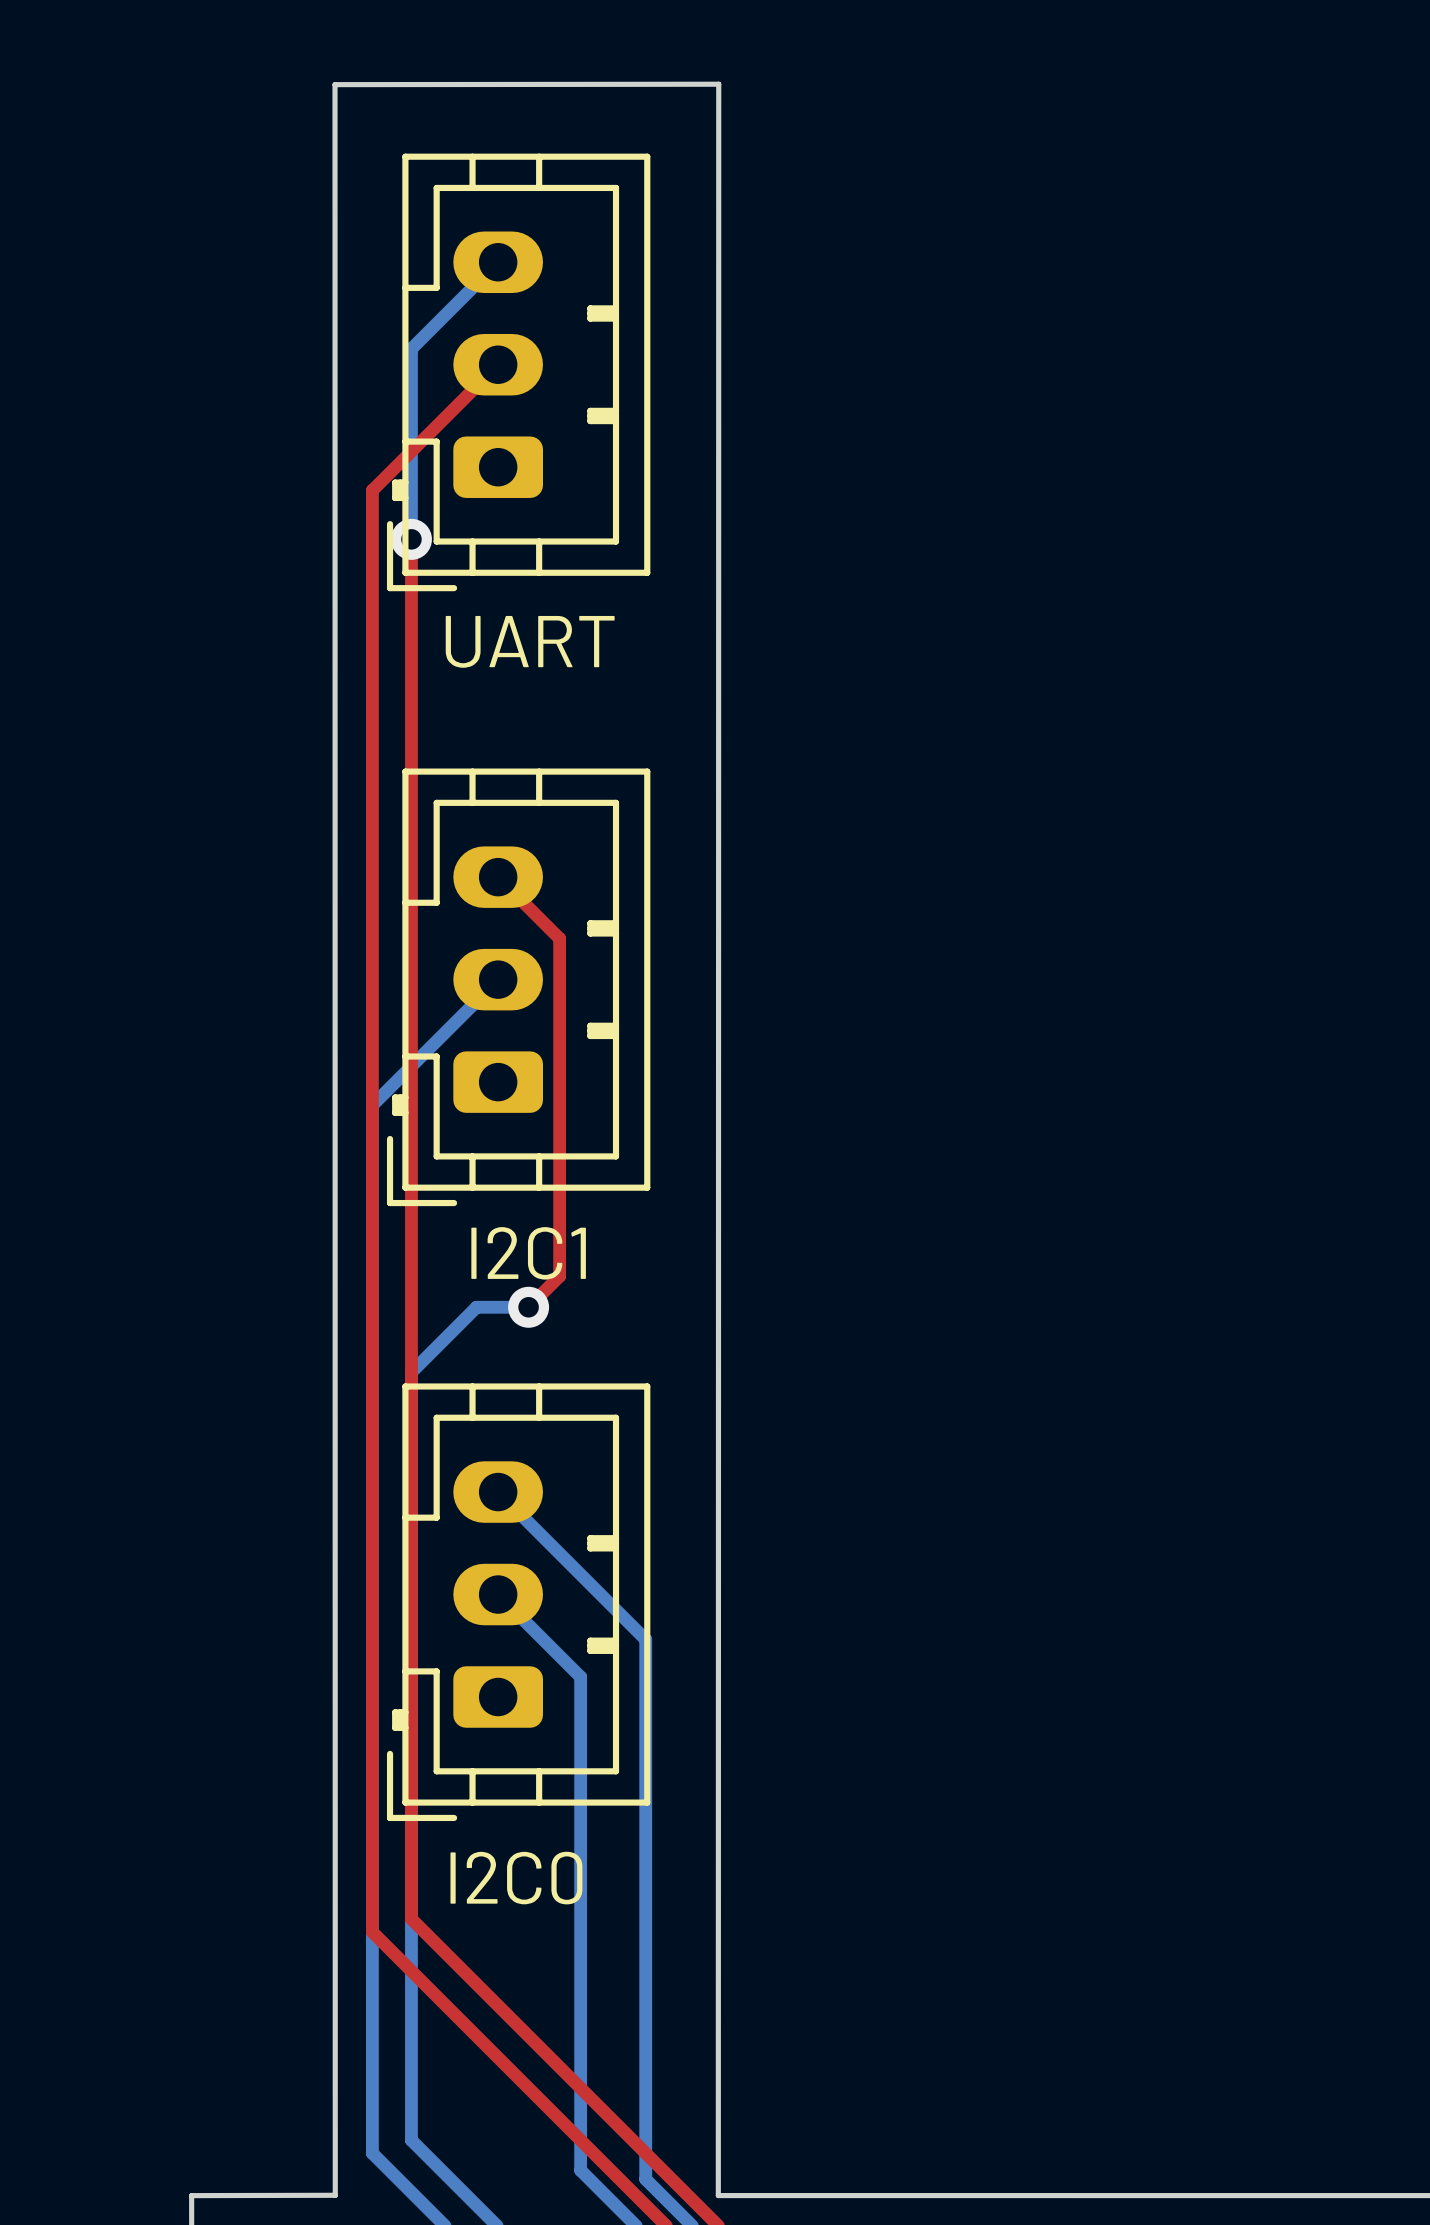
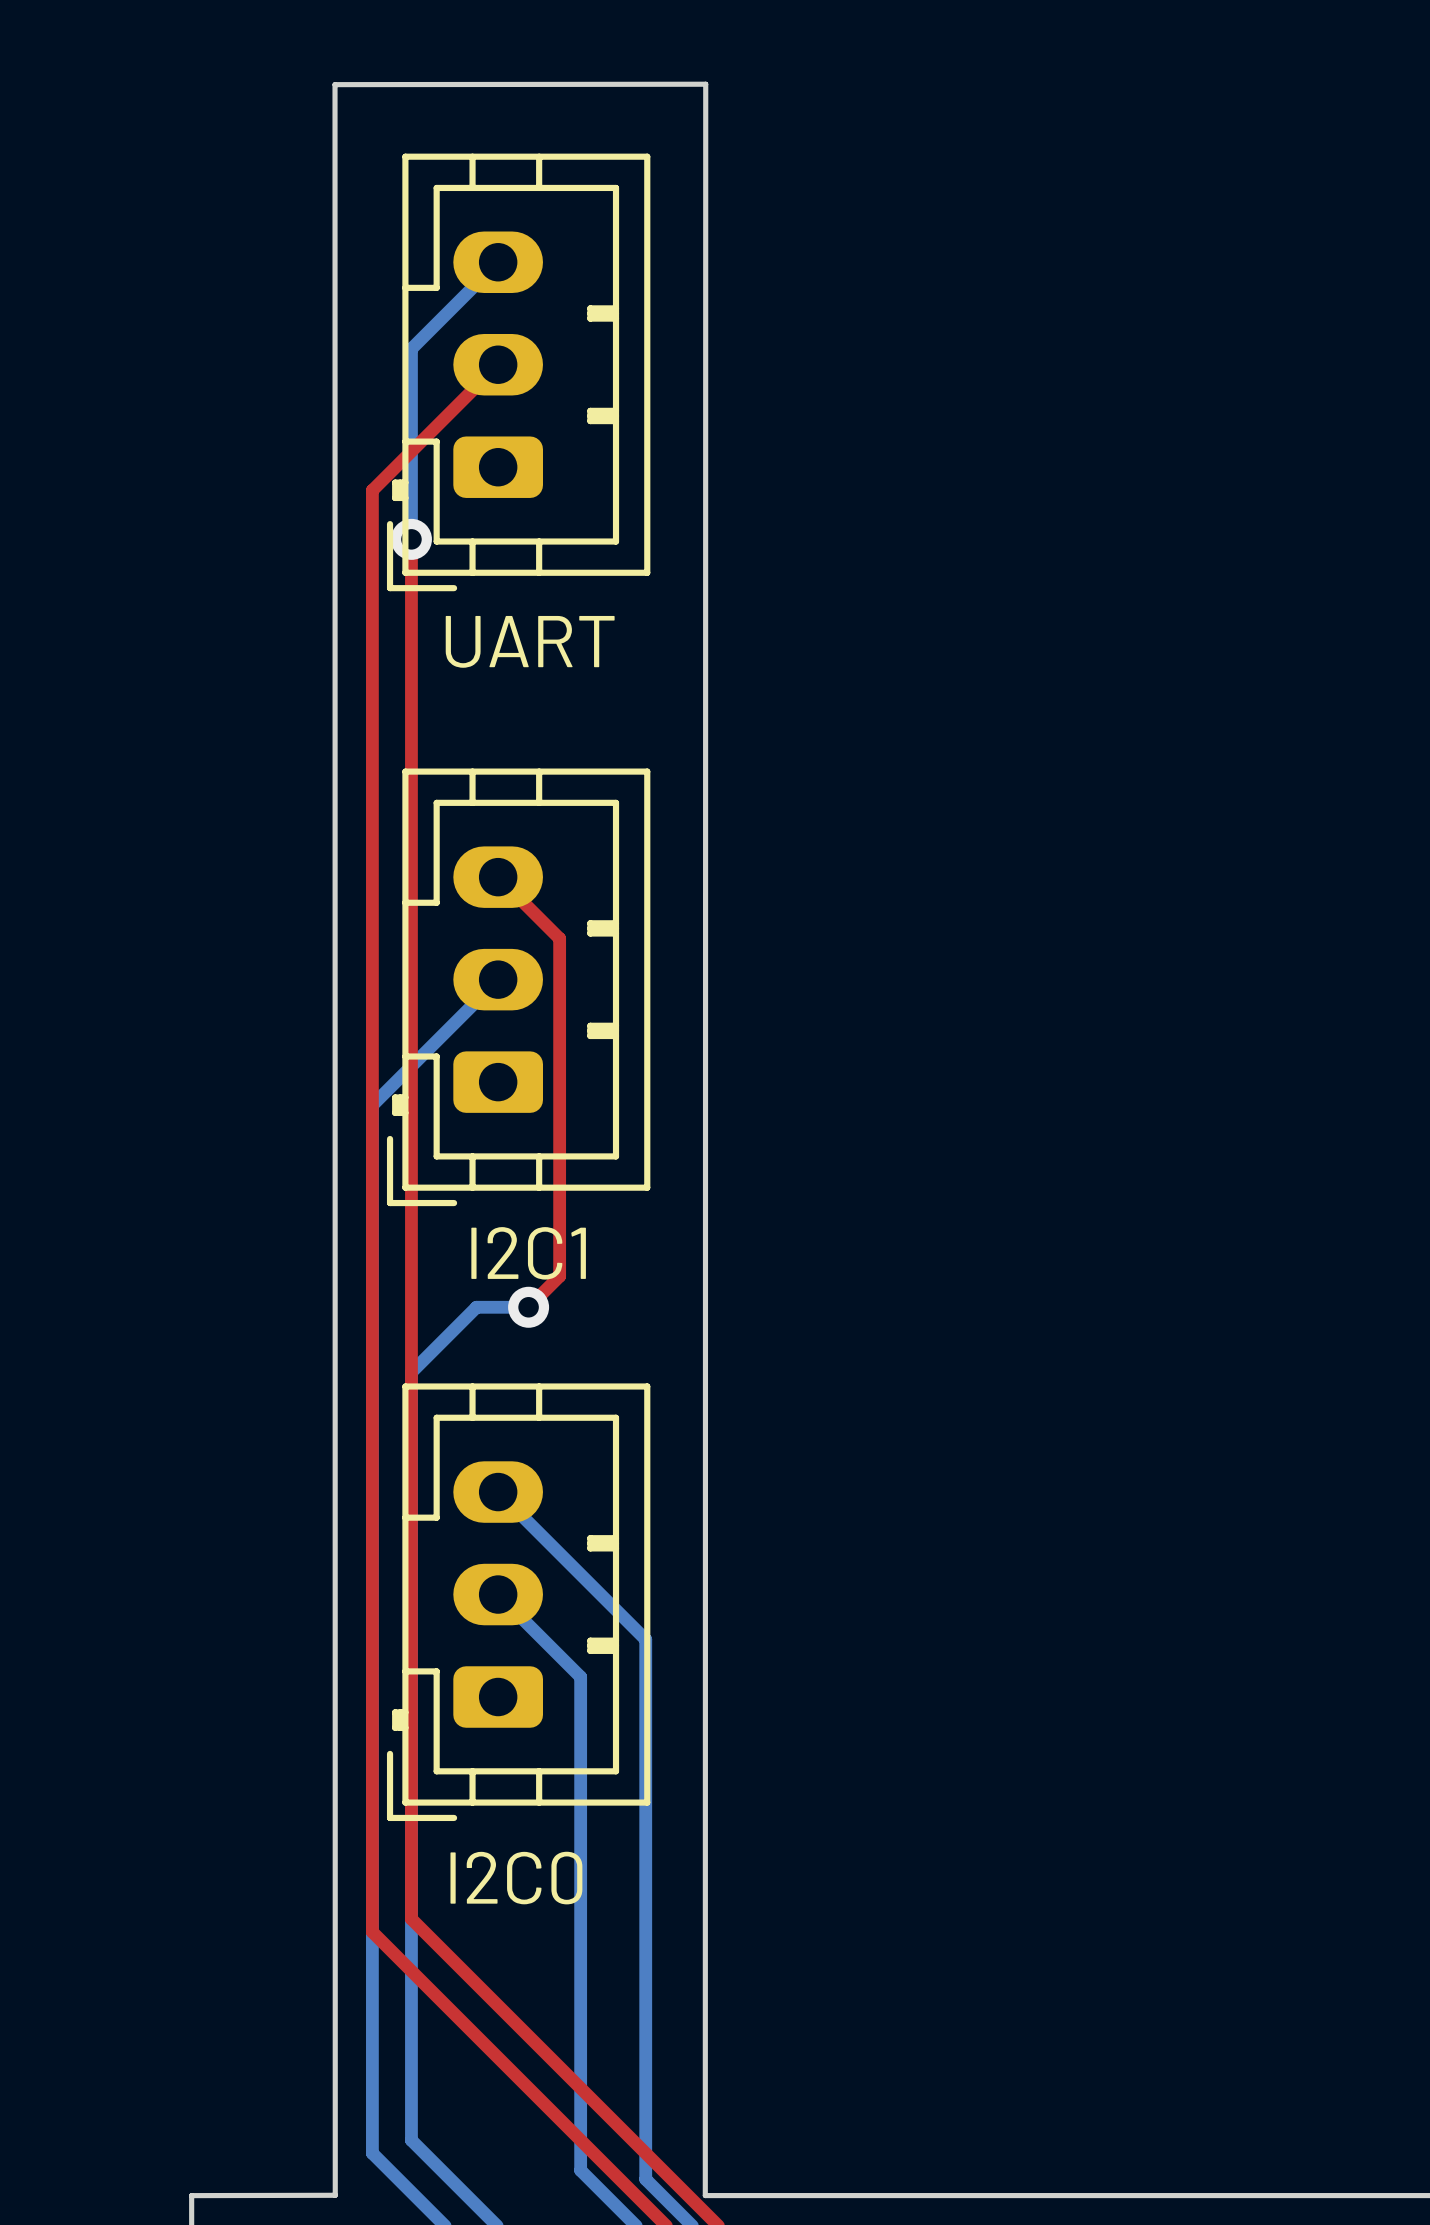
board edge: (335, 84) (718, 84) (718, 2195) -> (335, 84) (705, 84) (705, 2195) (718, 2195)

